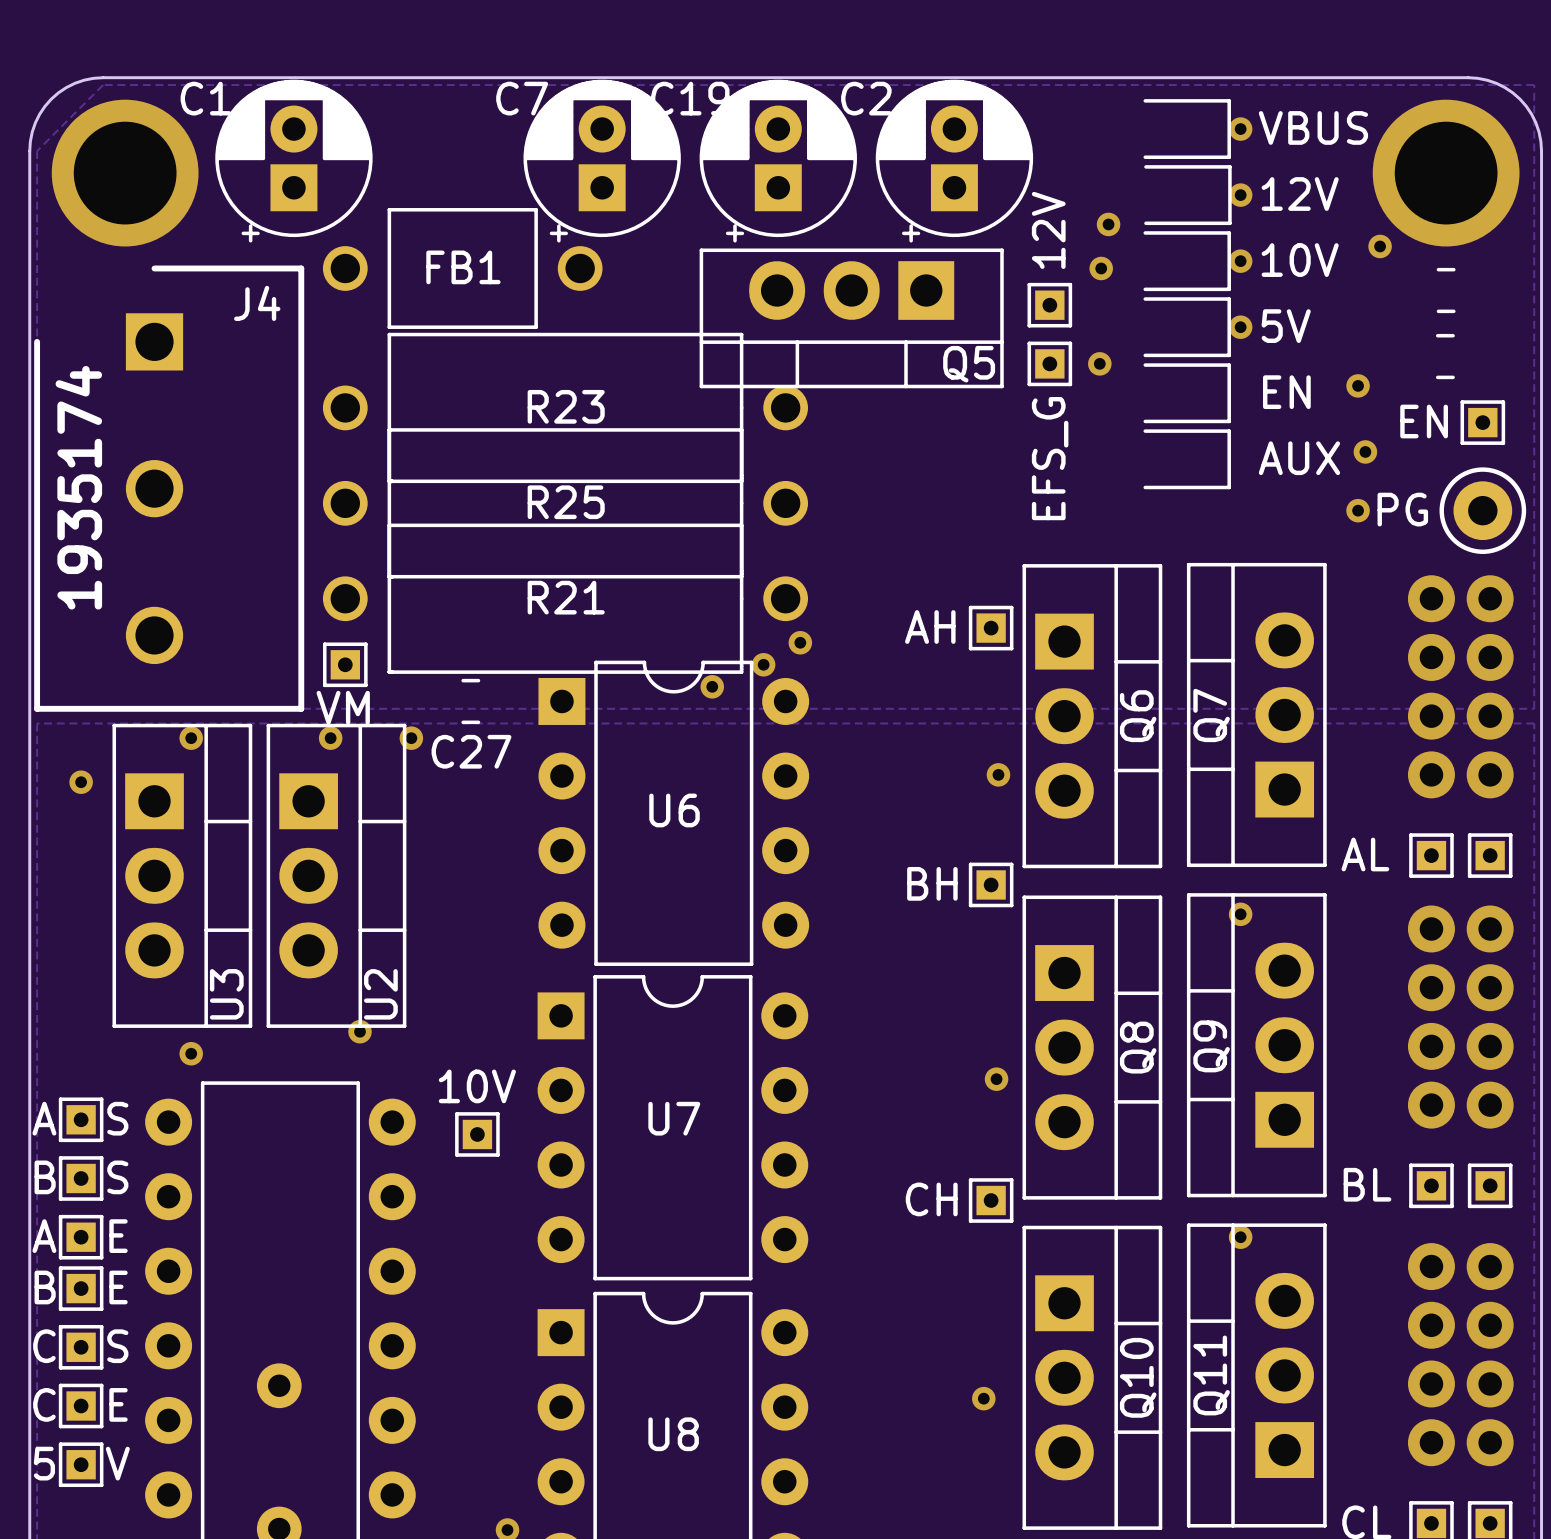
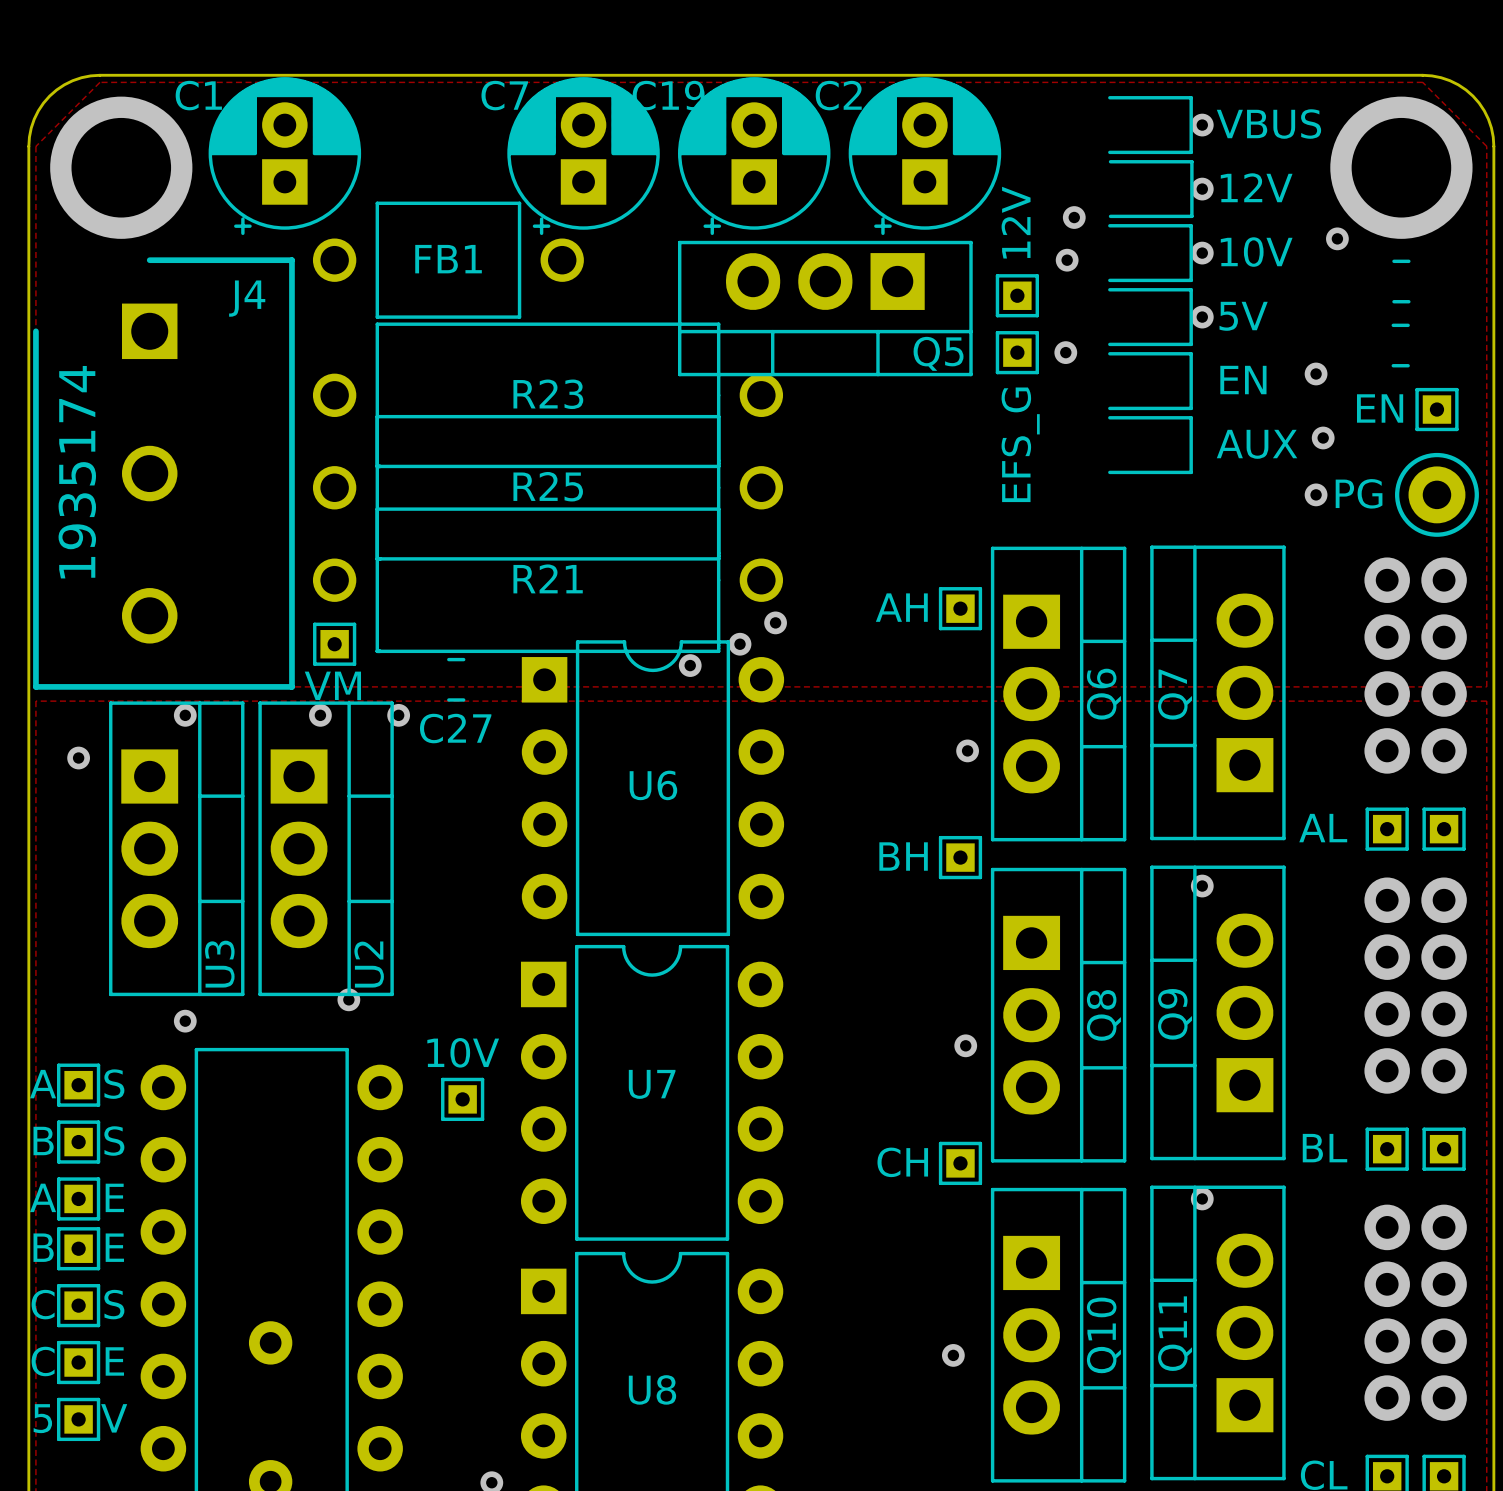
zone outline: (1468, 85) (1534, 85) (1534, 151) -> (1422, 82) (1486, 146)

